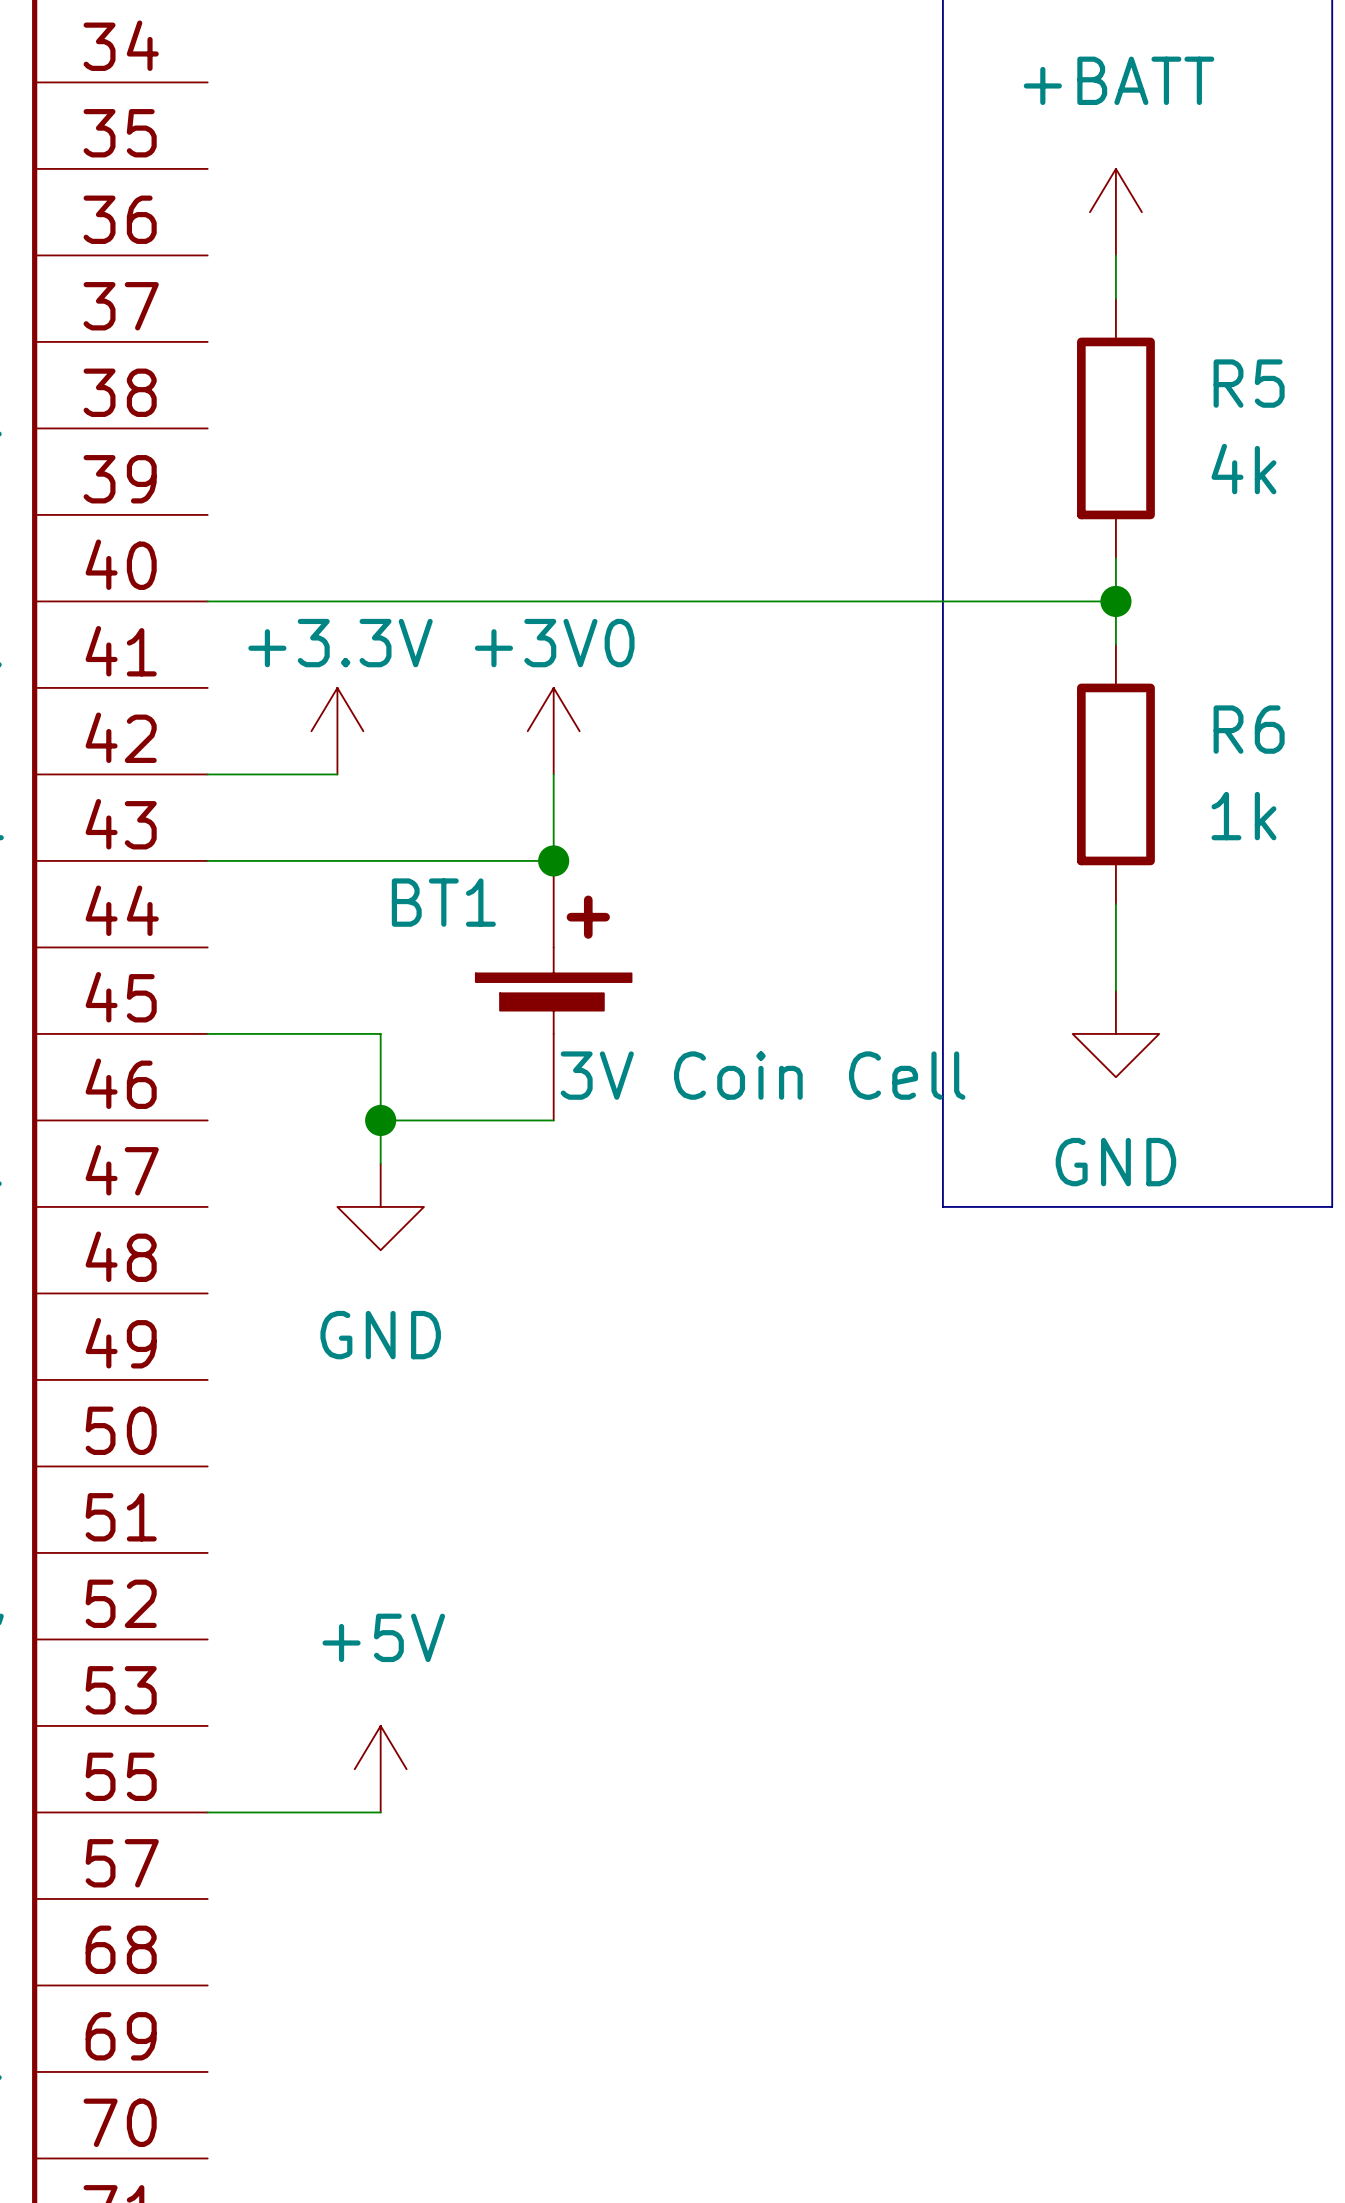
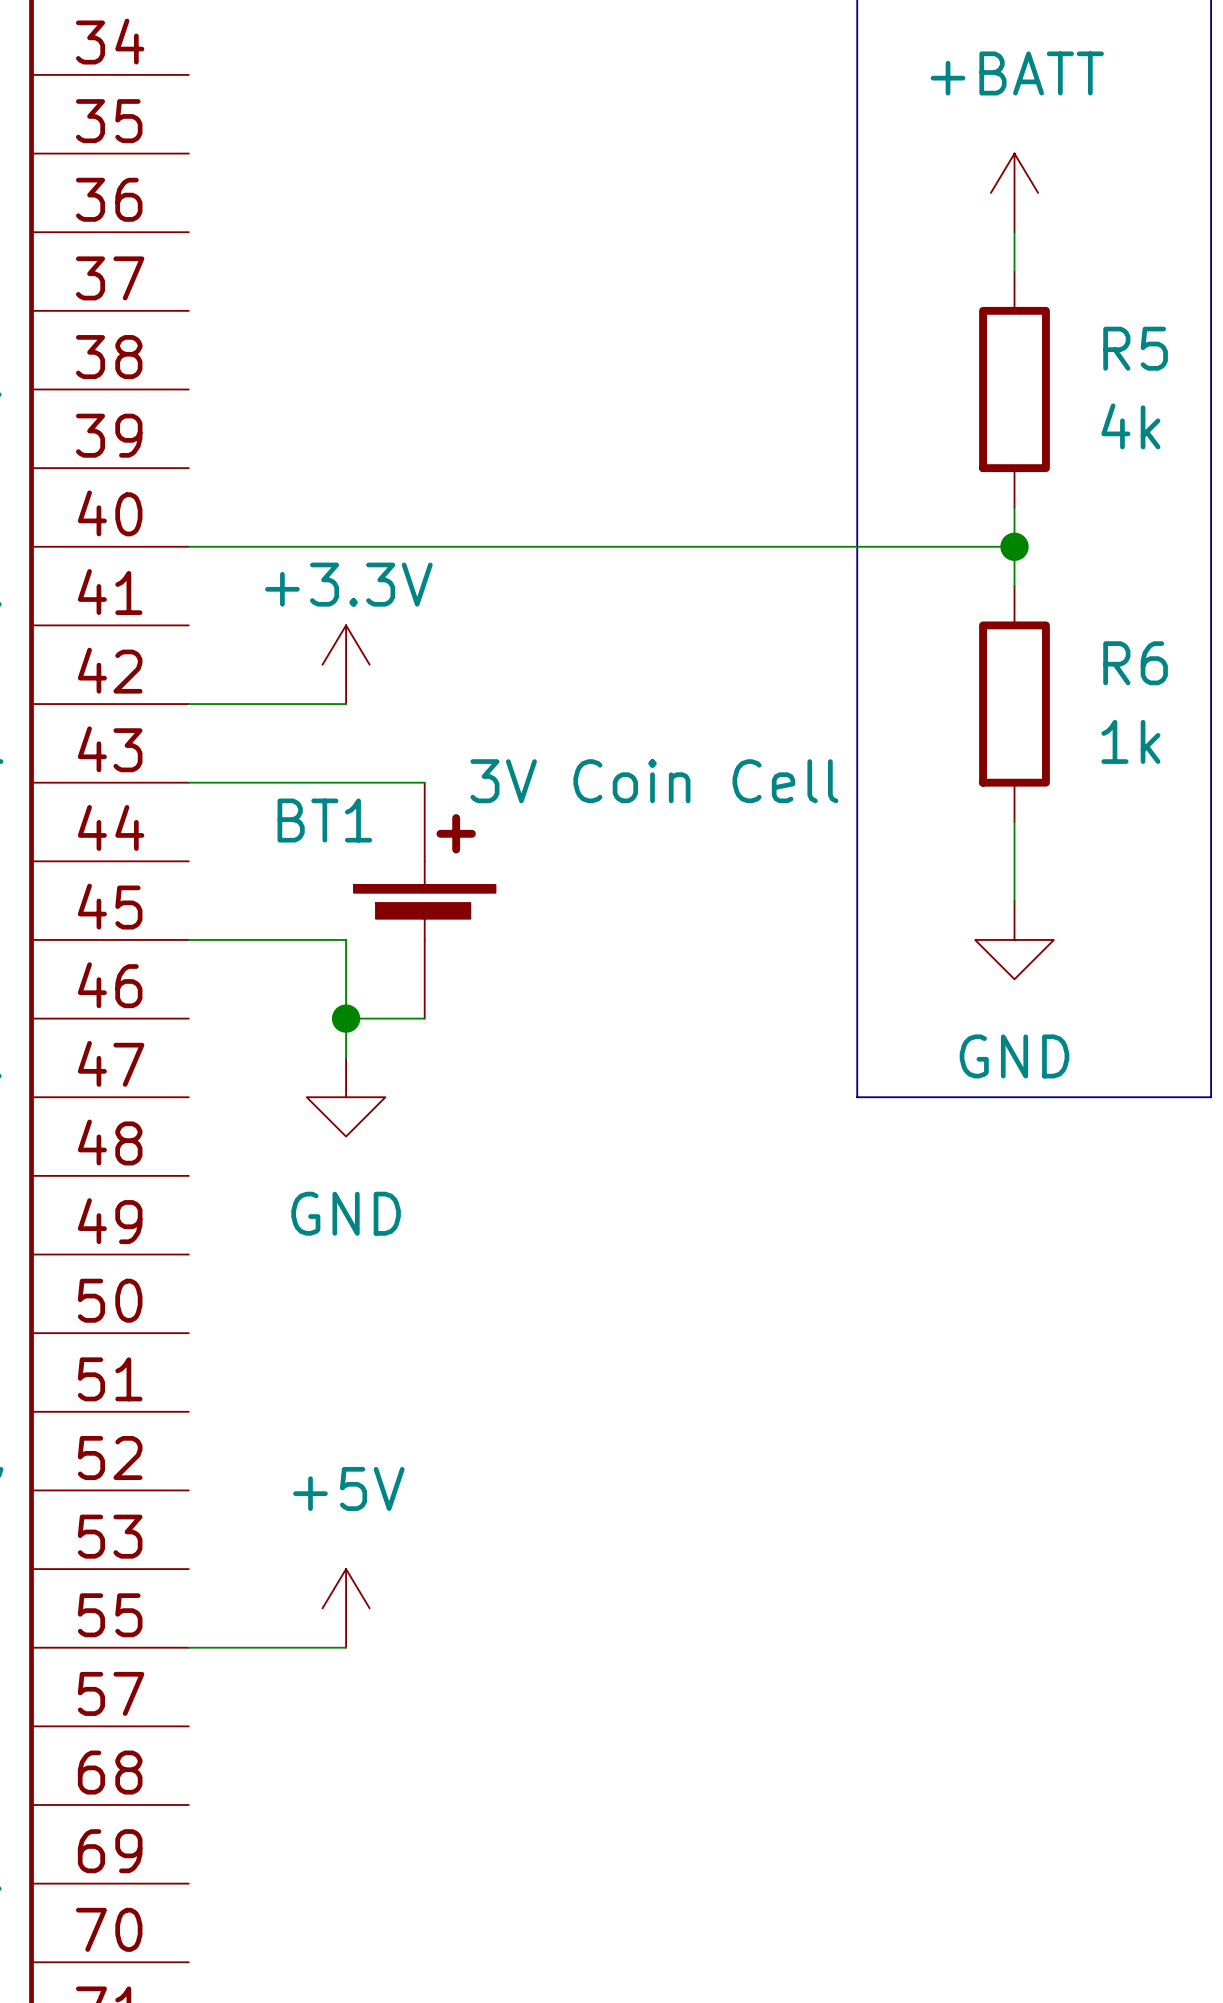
power symbol position: +3.3V (337, 731) -> +3.3V (346, 664)
power symbol: +3V0 (553, 731) -> none
wire: none -> (306, 704) (346, 704)
wire: (553, 774) (553, 860) (467, 860) -> none
junction: (553, 860) -> none
BT1 position: (553, 990) -> (424, 900)
BT1 value position: 3V Coin Cell (763, 1075) -> 3V Coin Cell (654, 781)
wire: (467, 1120) (553, 1120) -> none

